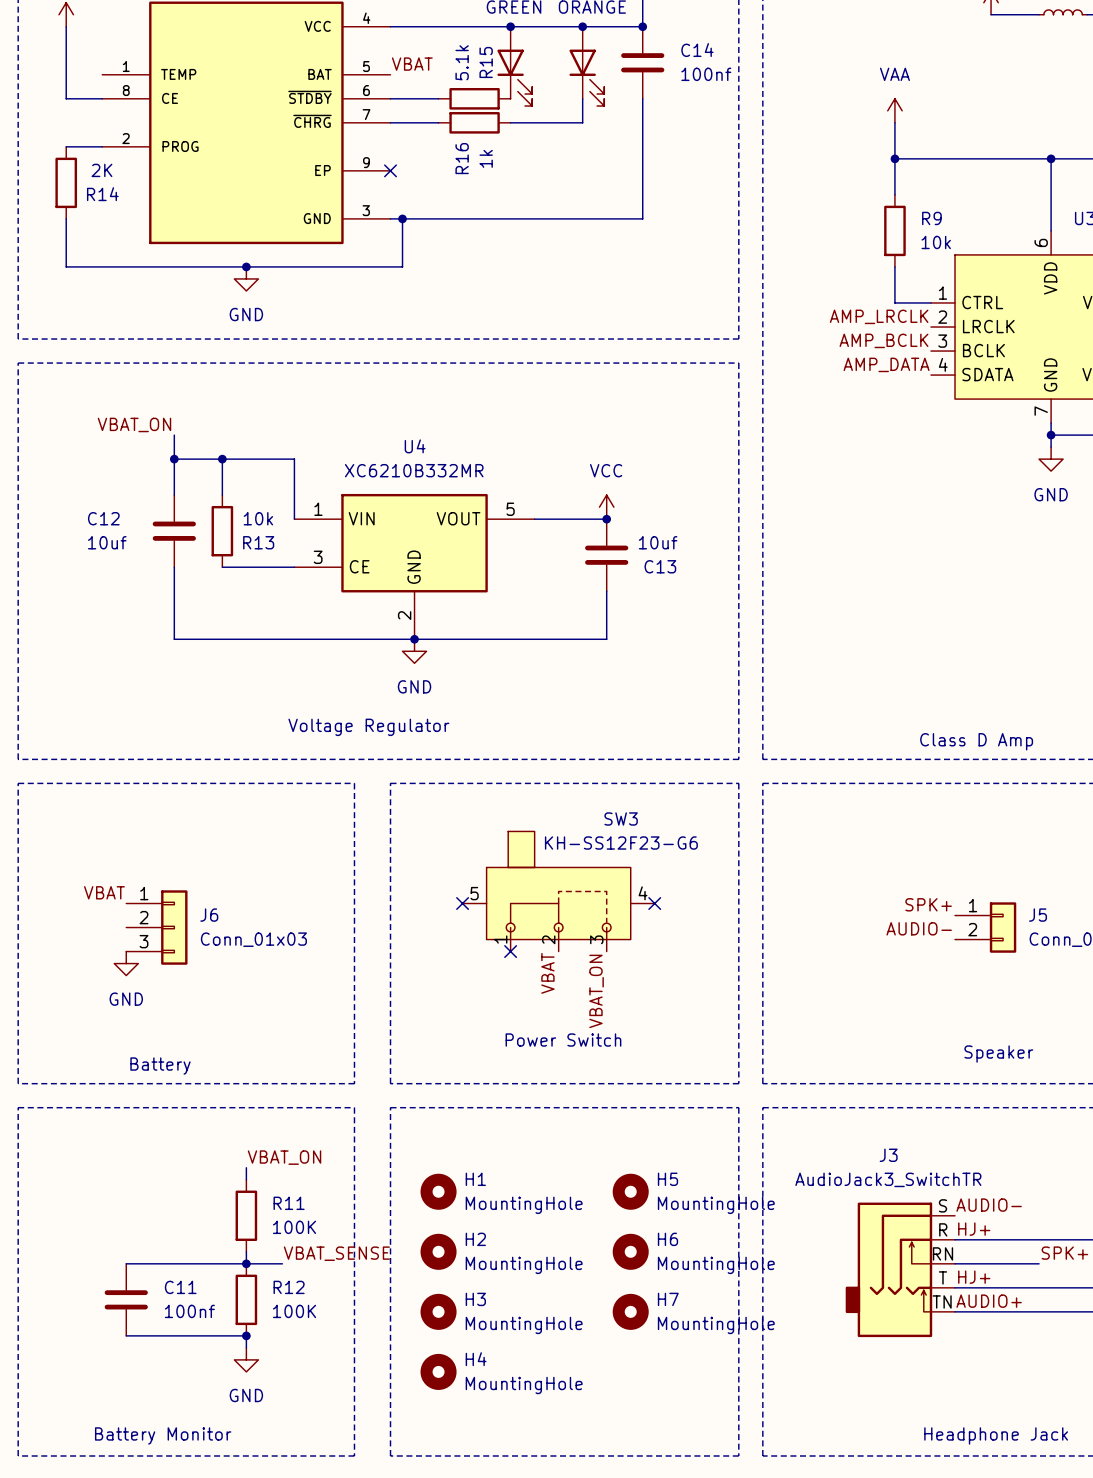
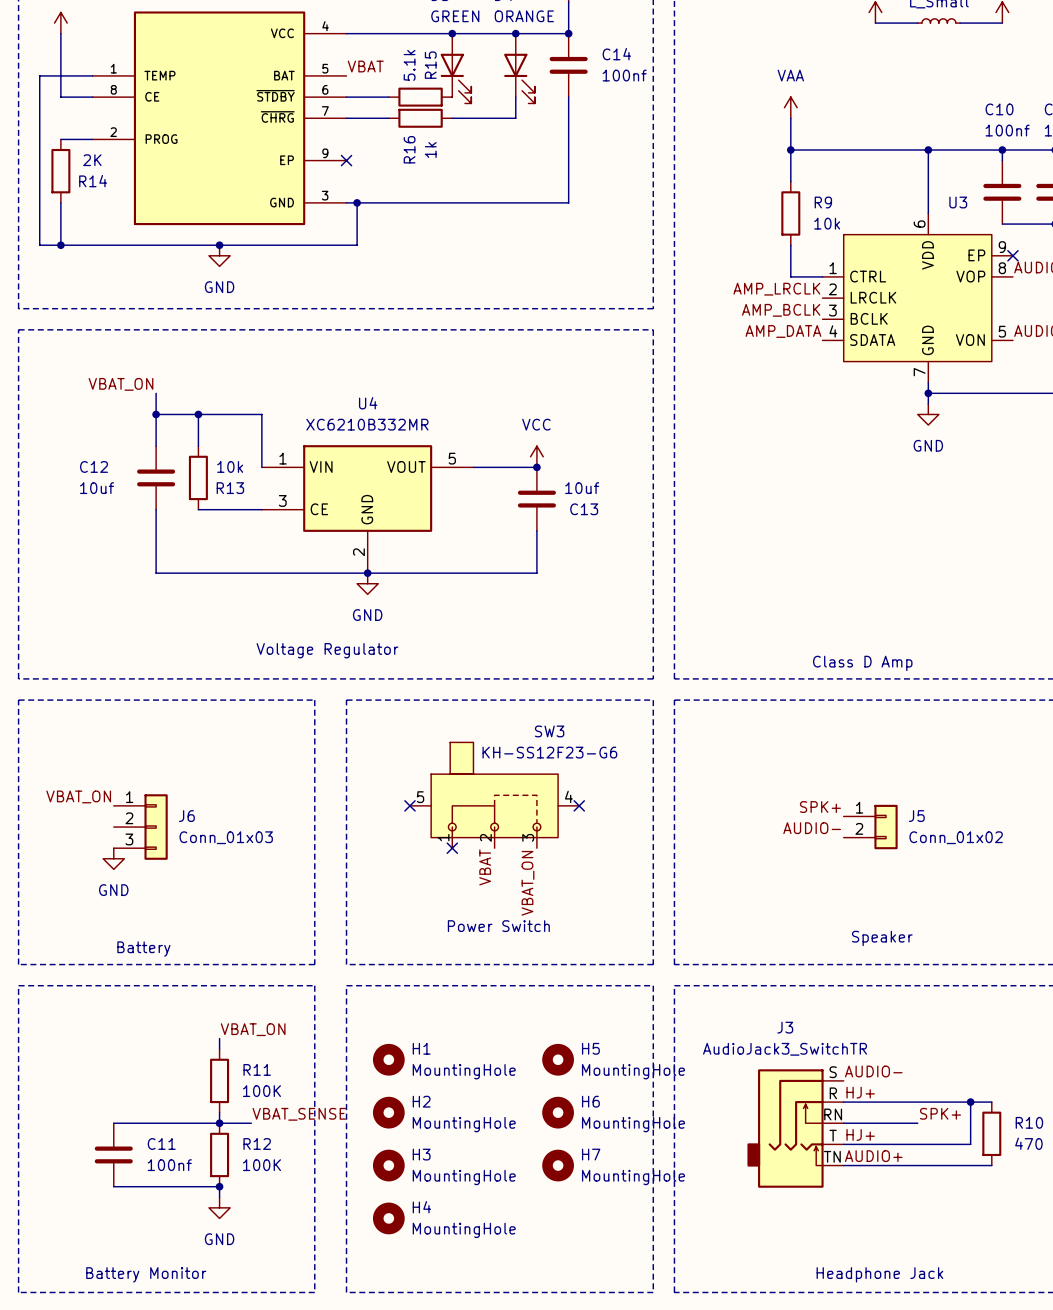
wire: none -> (92, 75) (39, 75) (39, 245) (60, 245)
junction: none -> (60, 245)
label: VBAT (104, 892) -> VBAT_ON (78, 796)

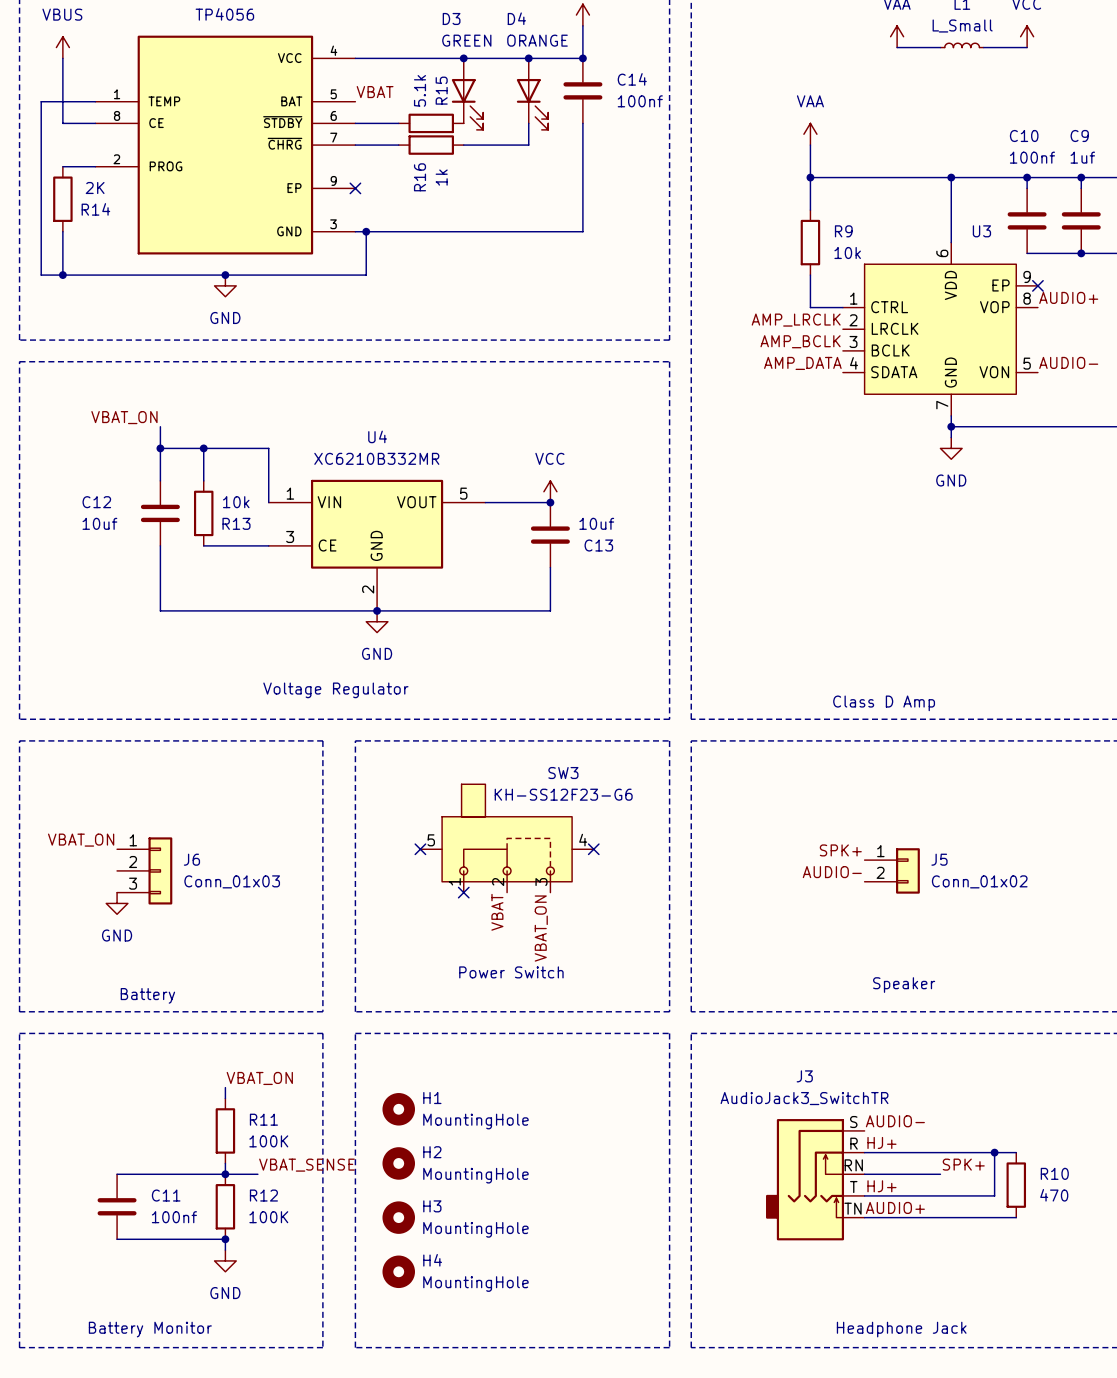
H5: MountingHole (558, 1059) -> none
H6: MountingHole (558, 1112) -> none
H7: MountingHole (558, 1165) -> none

